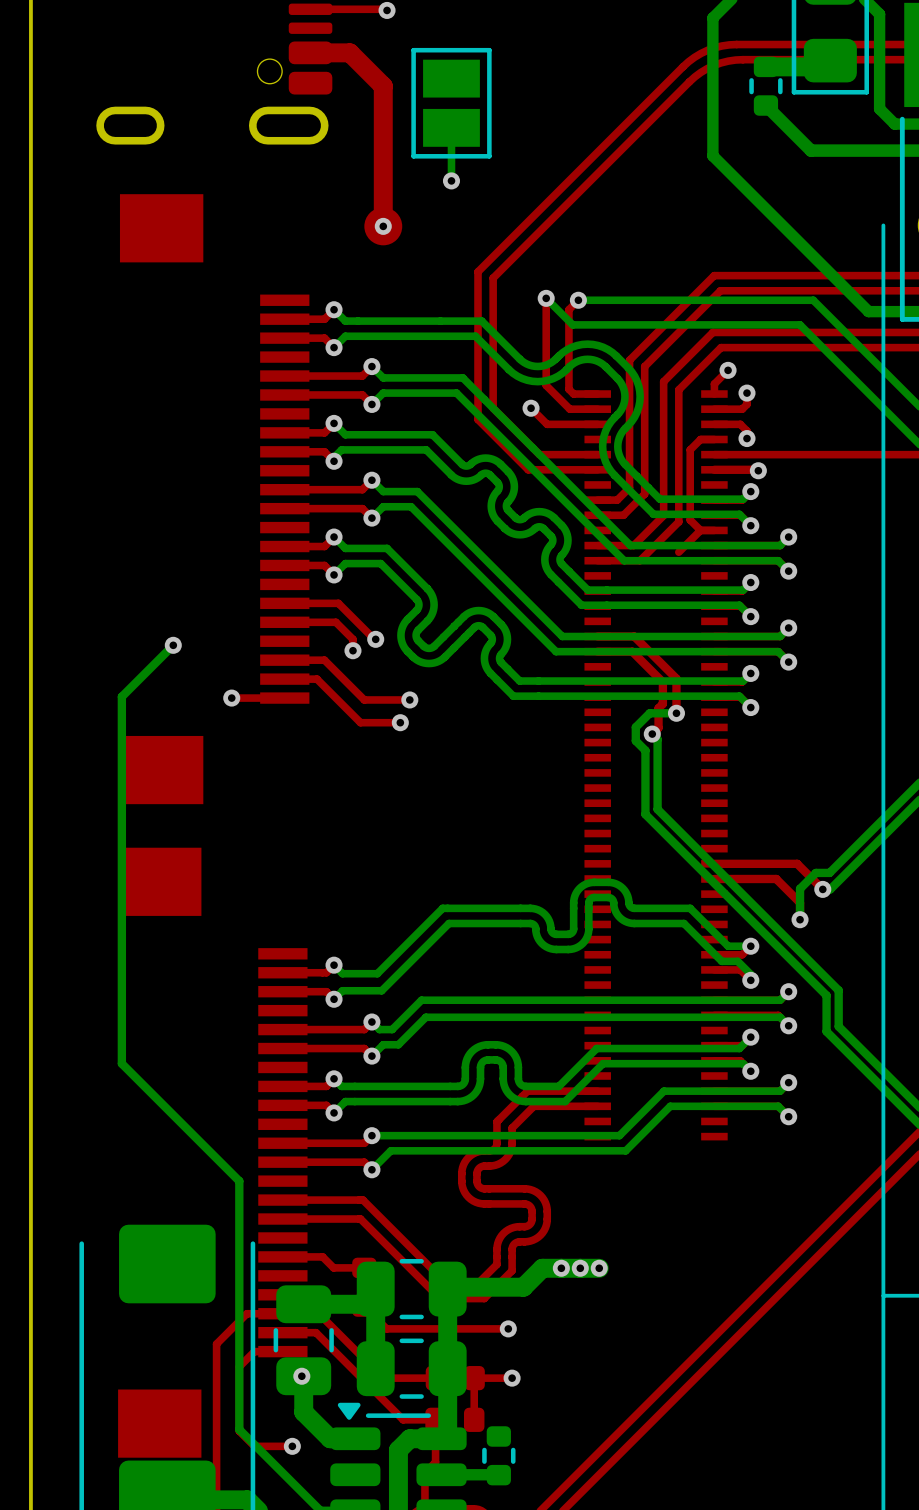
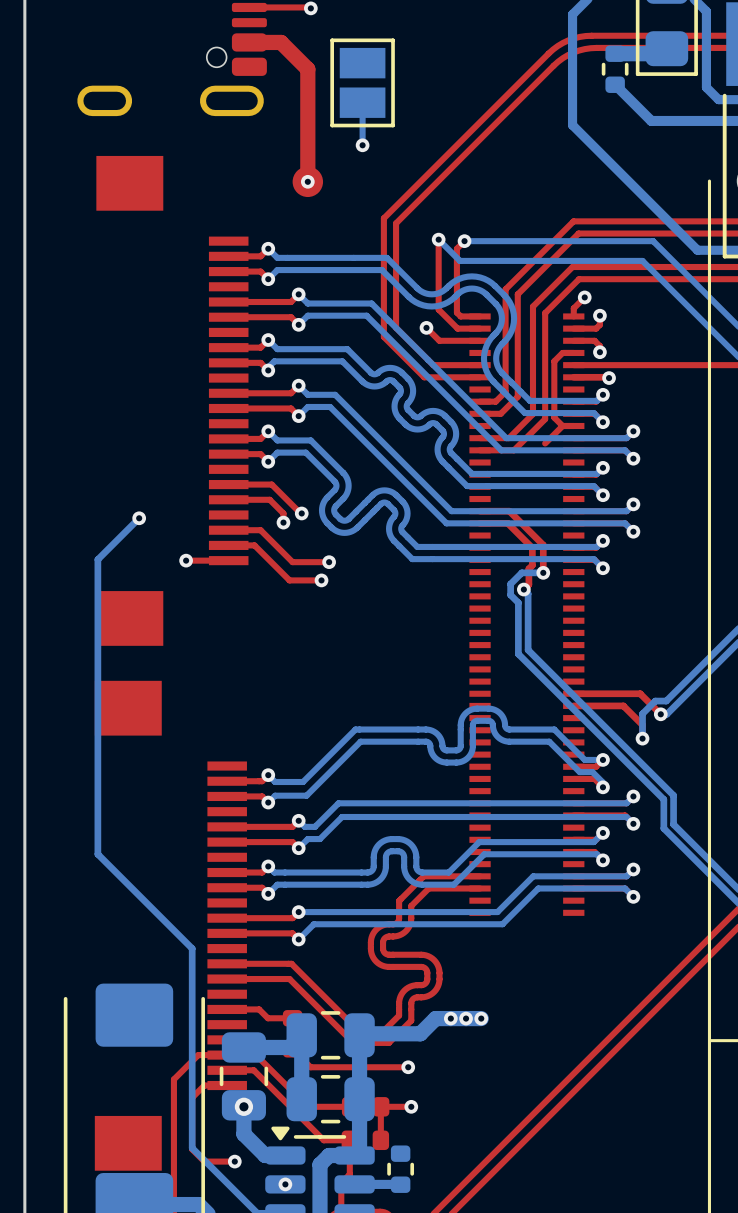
via position: (301, 1376) -> (285, 1184)
via: none -> (243, 1106)

